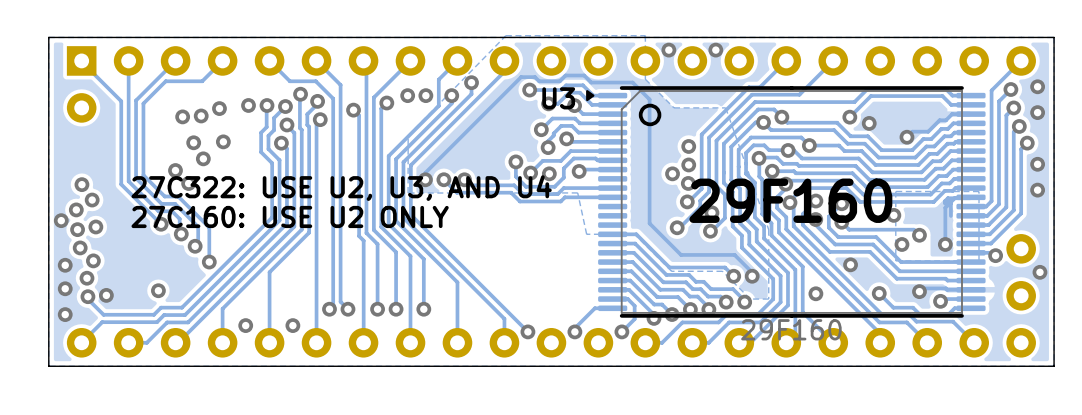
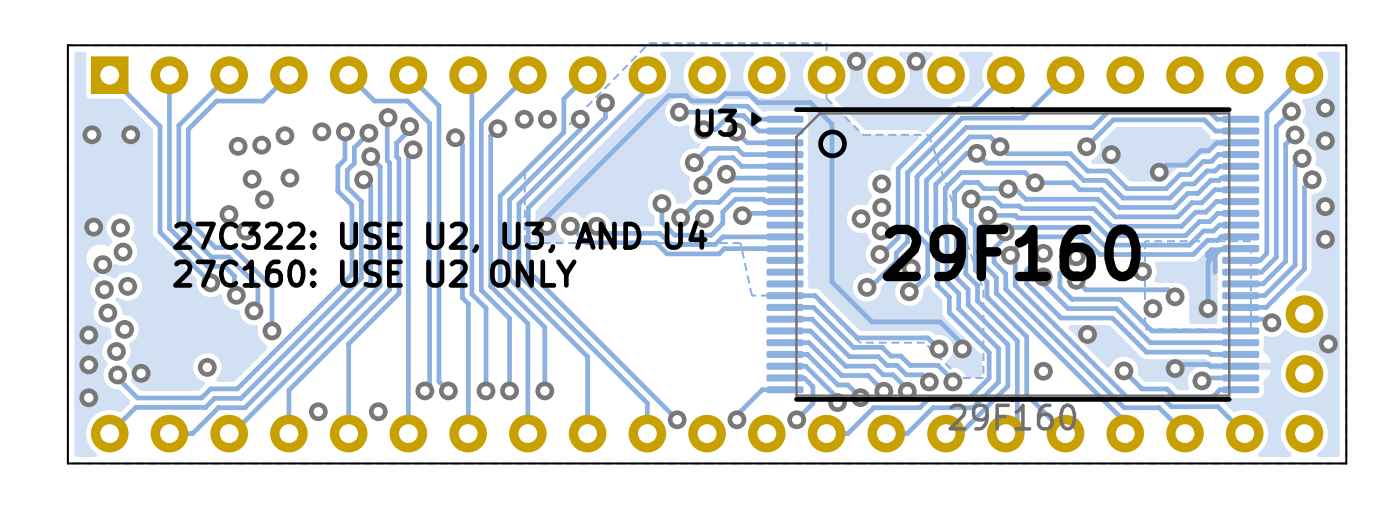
via: none -> (91, 134)
part: (81, 107) -> none
via: none -> (130, 134)
via: none -> (93, 227)
via: none -> (120, 227)
via: (81, 184) -> none
via: (61, 220) -> none

